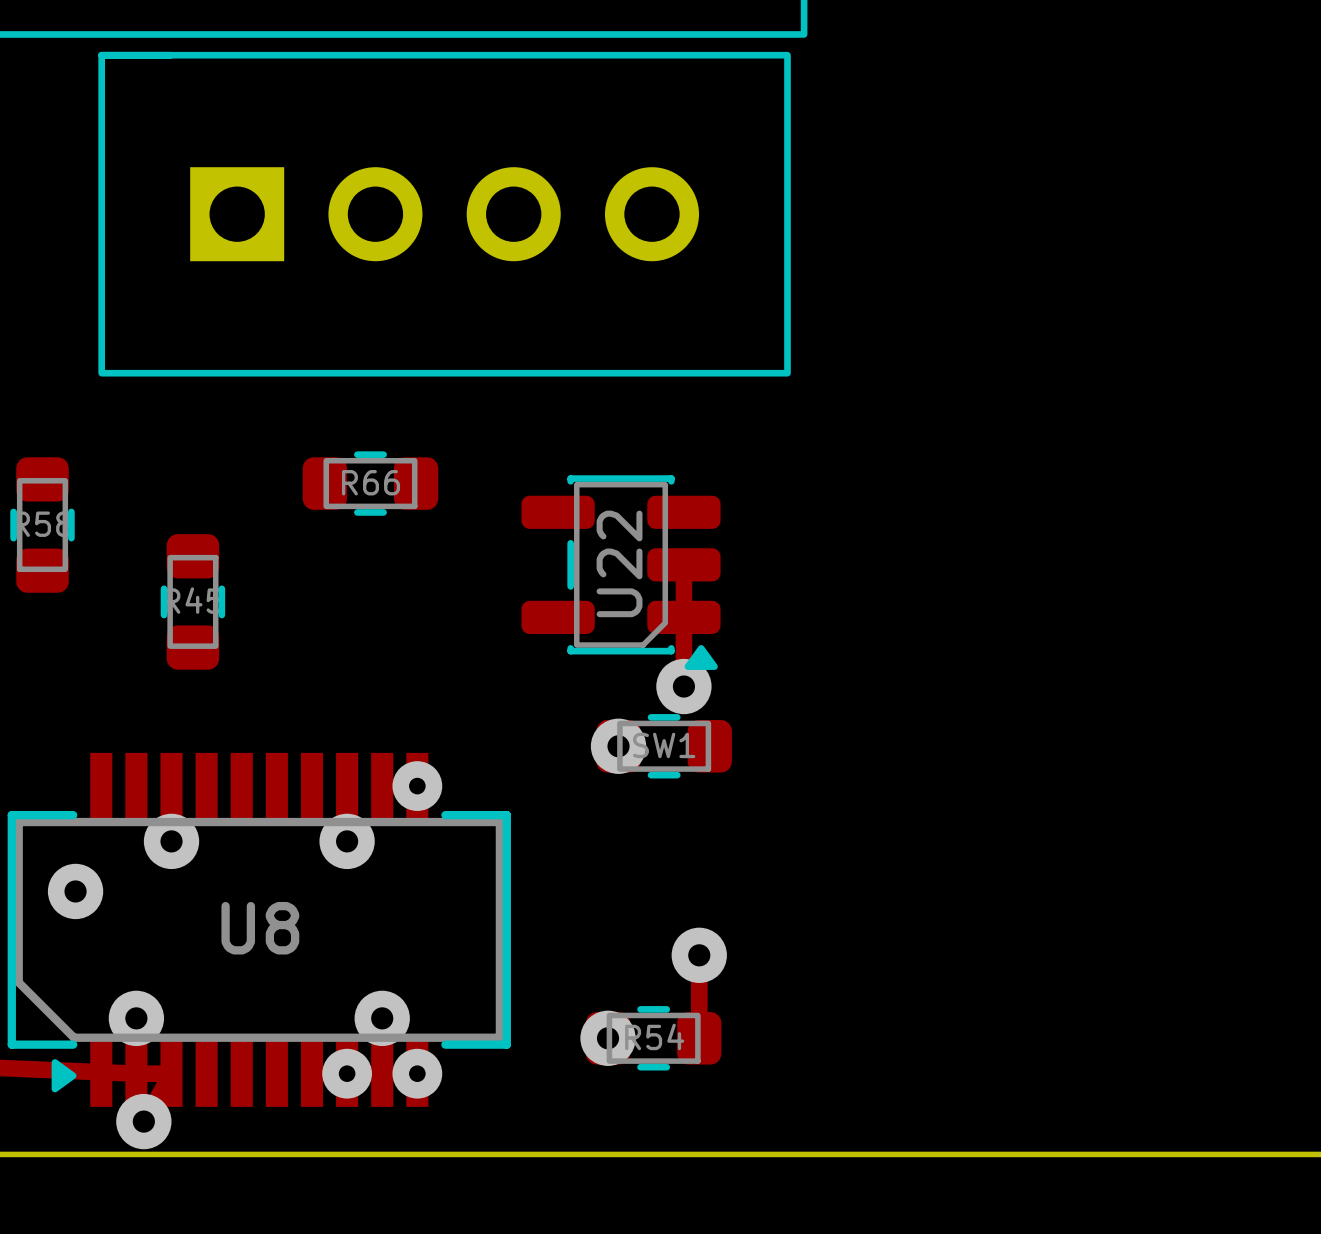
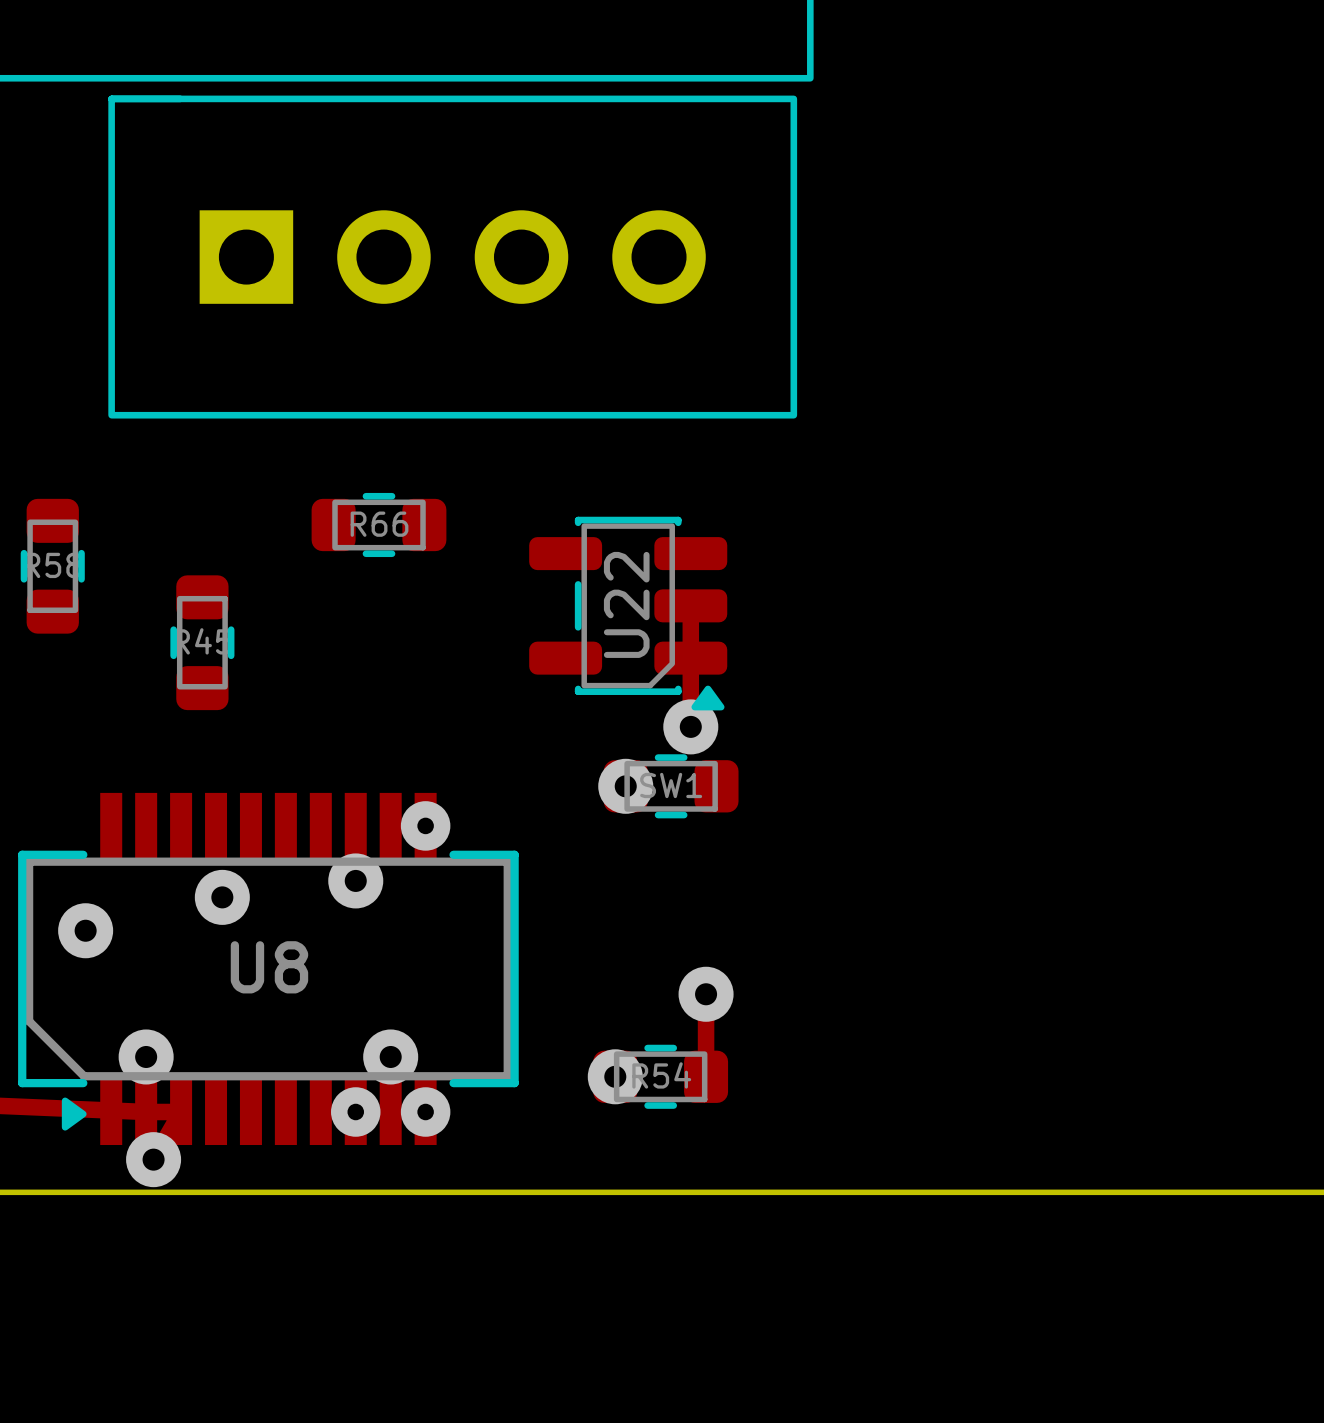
via position: (171, 841) -> (222, 897)

